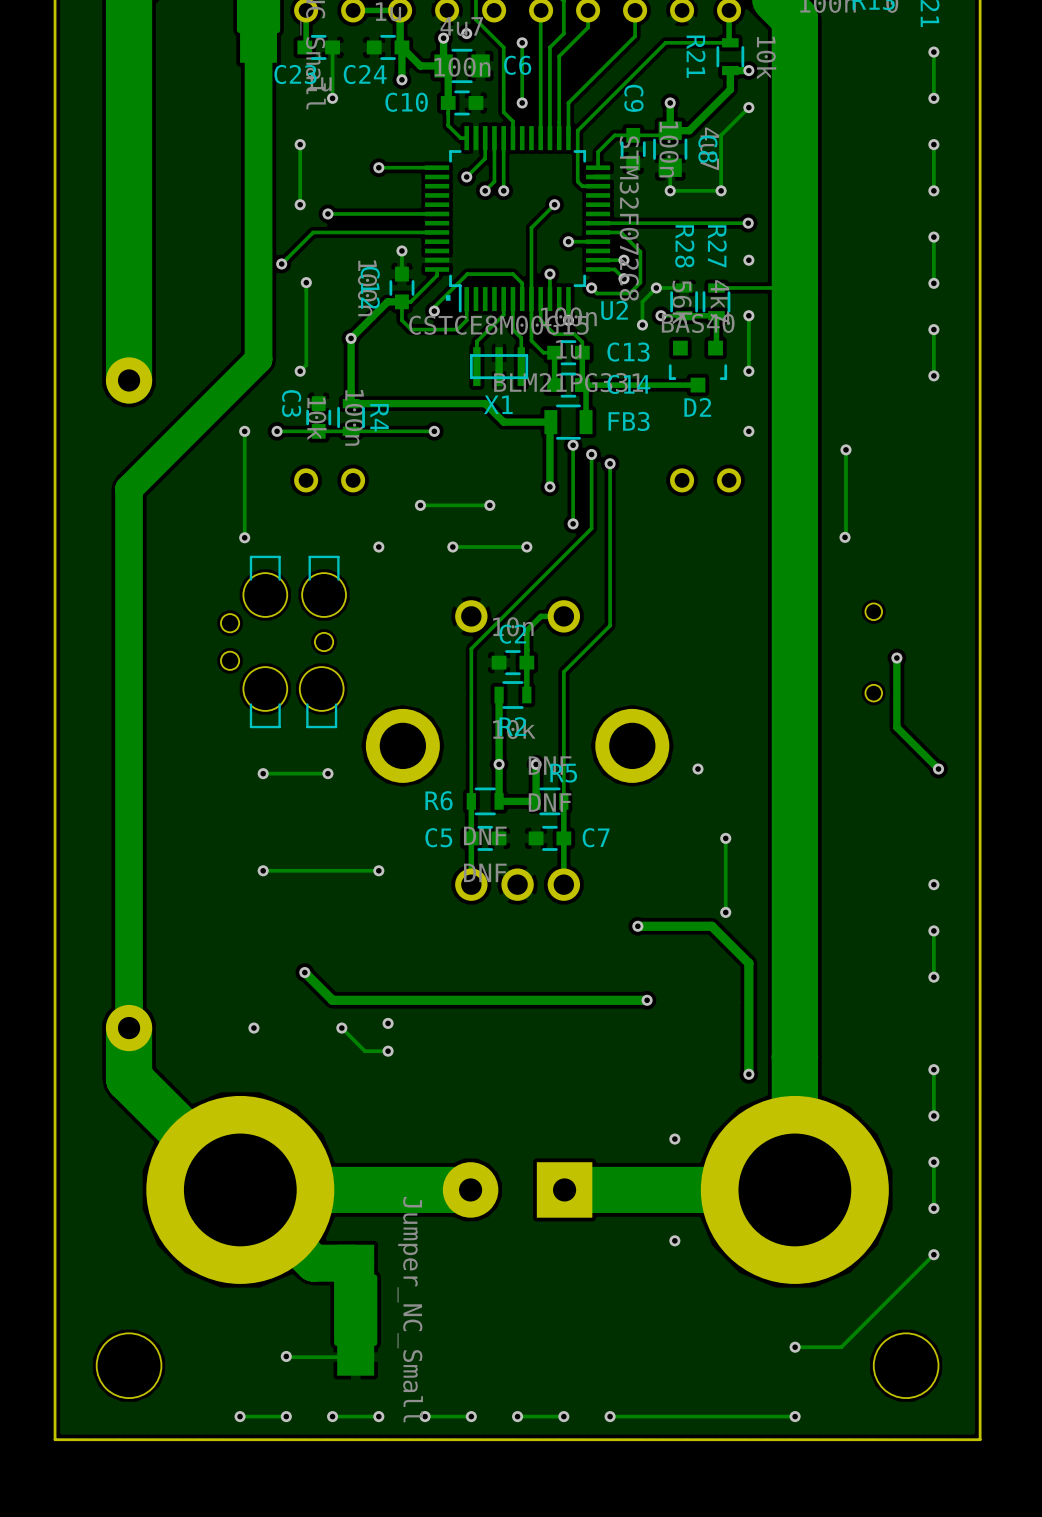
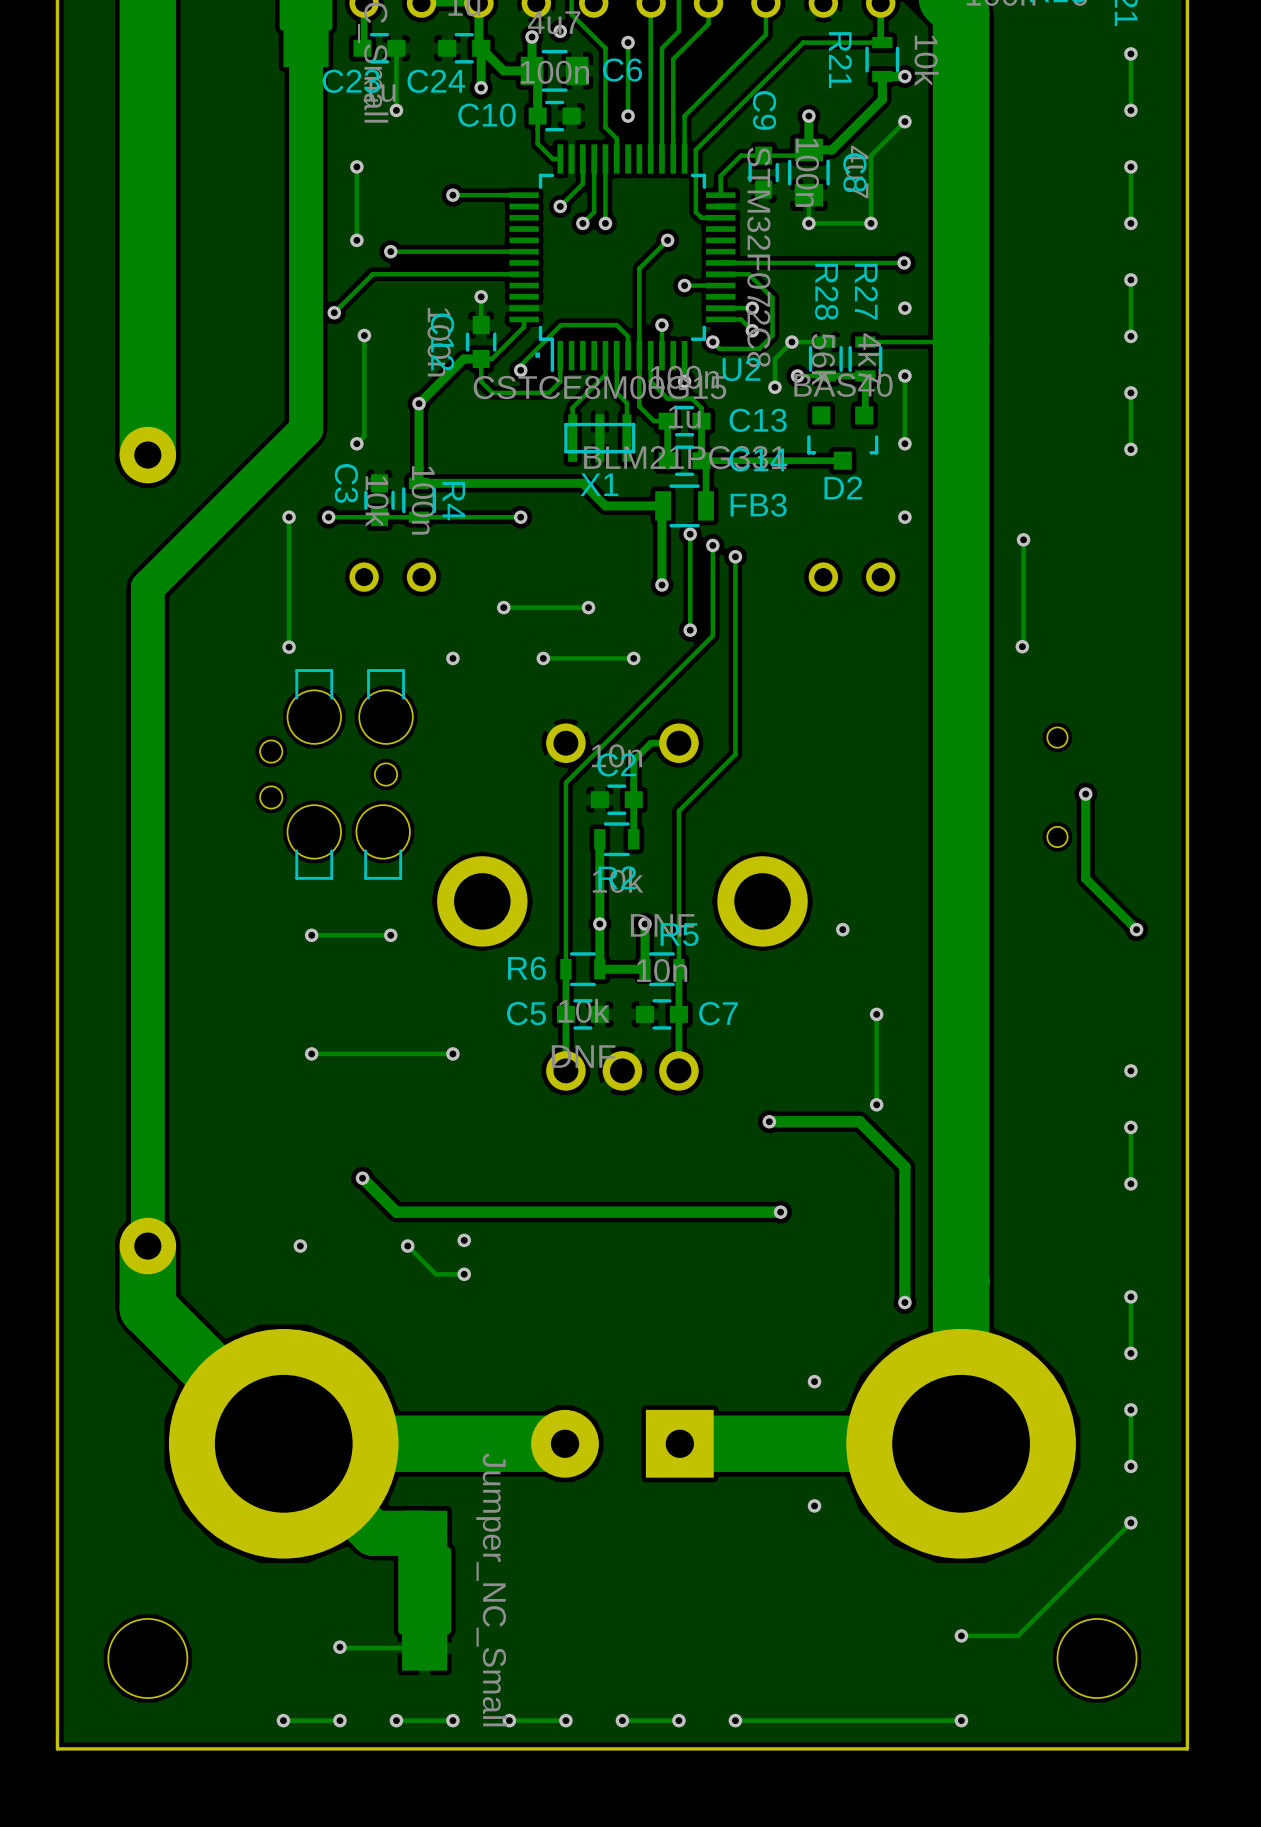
C7 value: DNF (550, 802) -> 10n (662, 970)
R6 value: DNF (485, 835) -> 10k (584, 1010)

